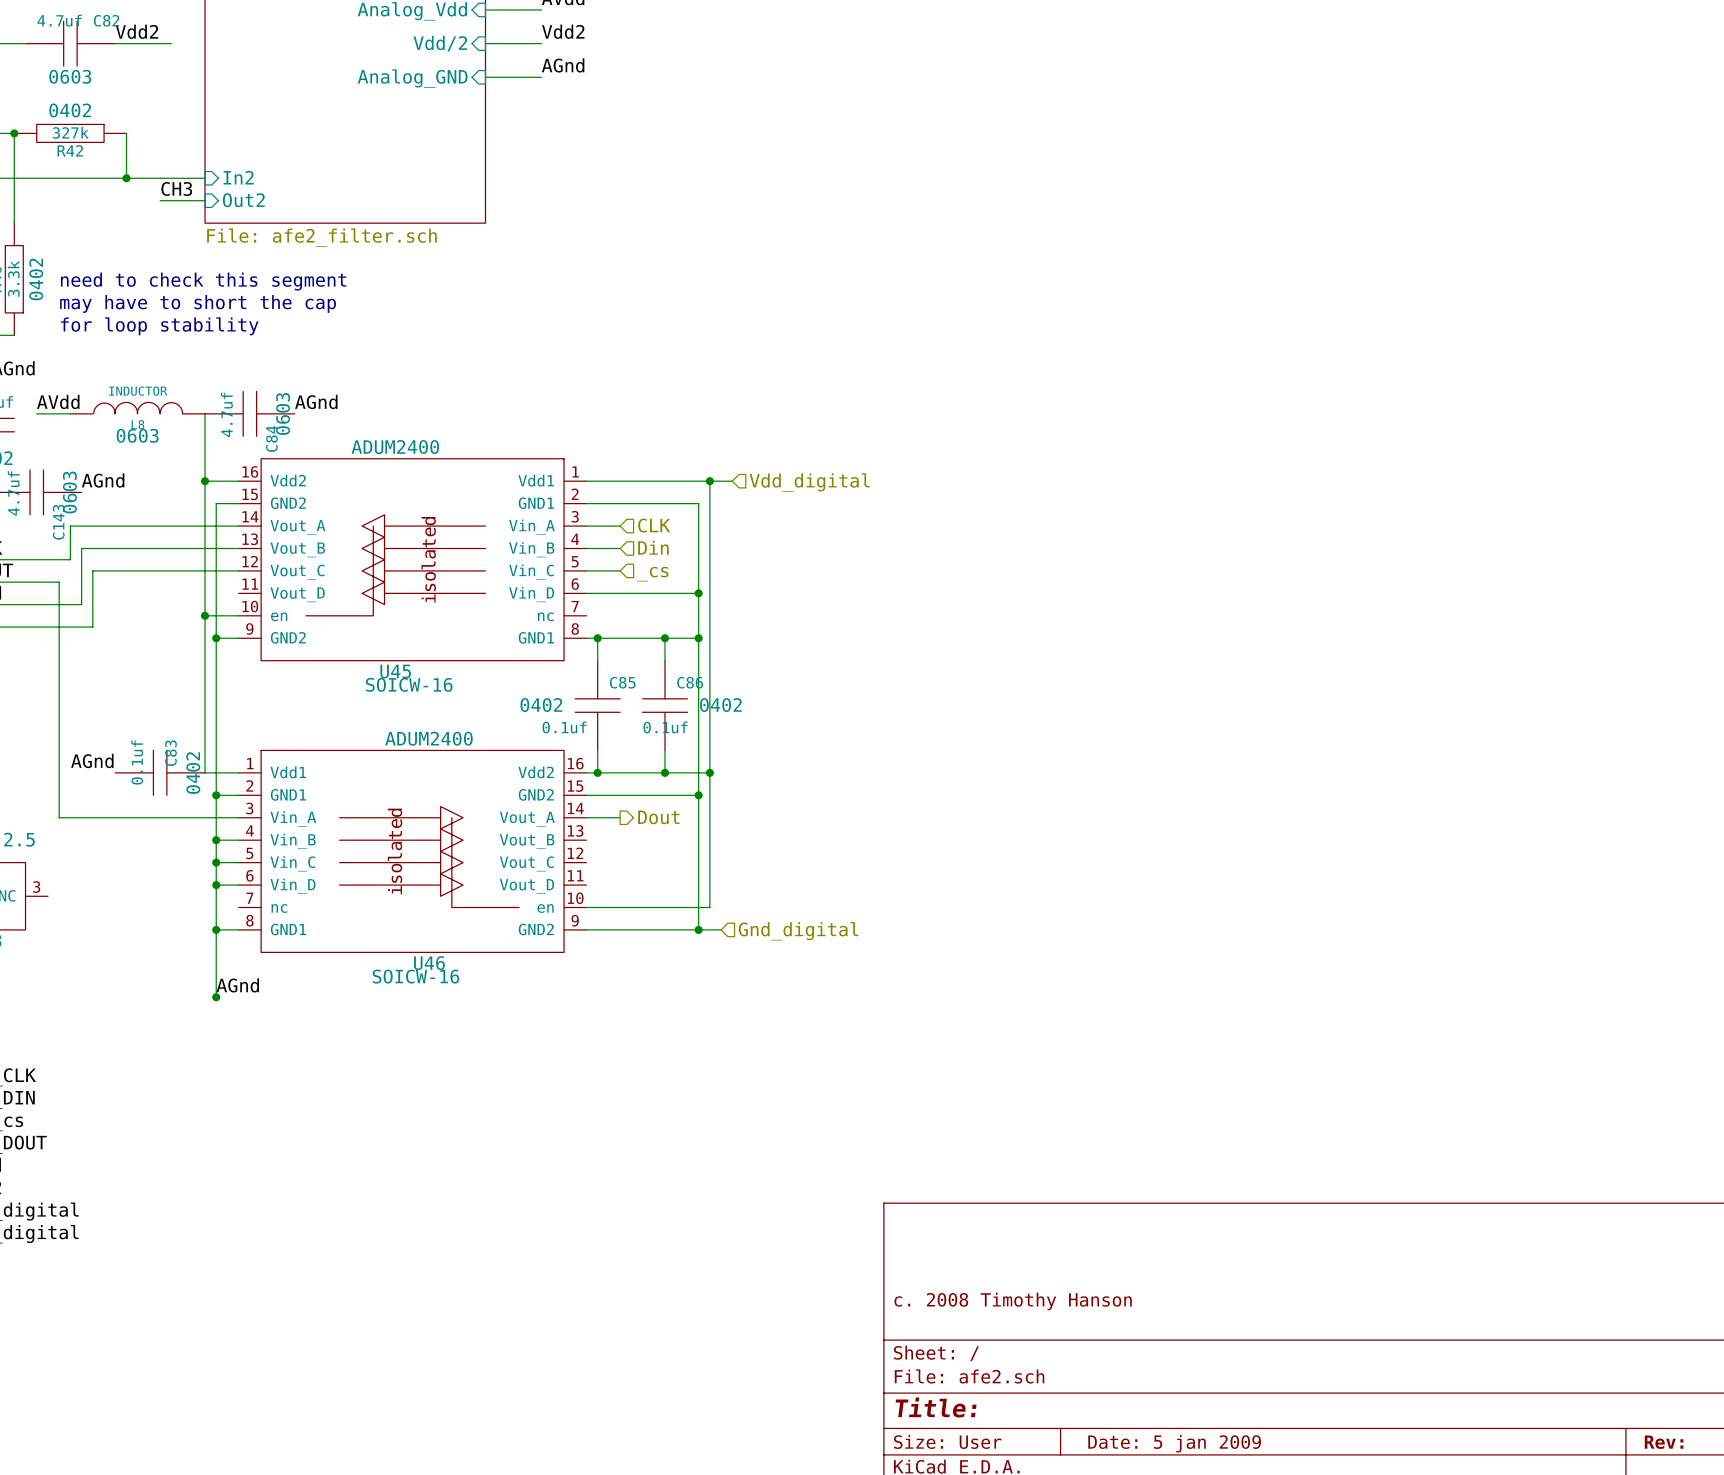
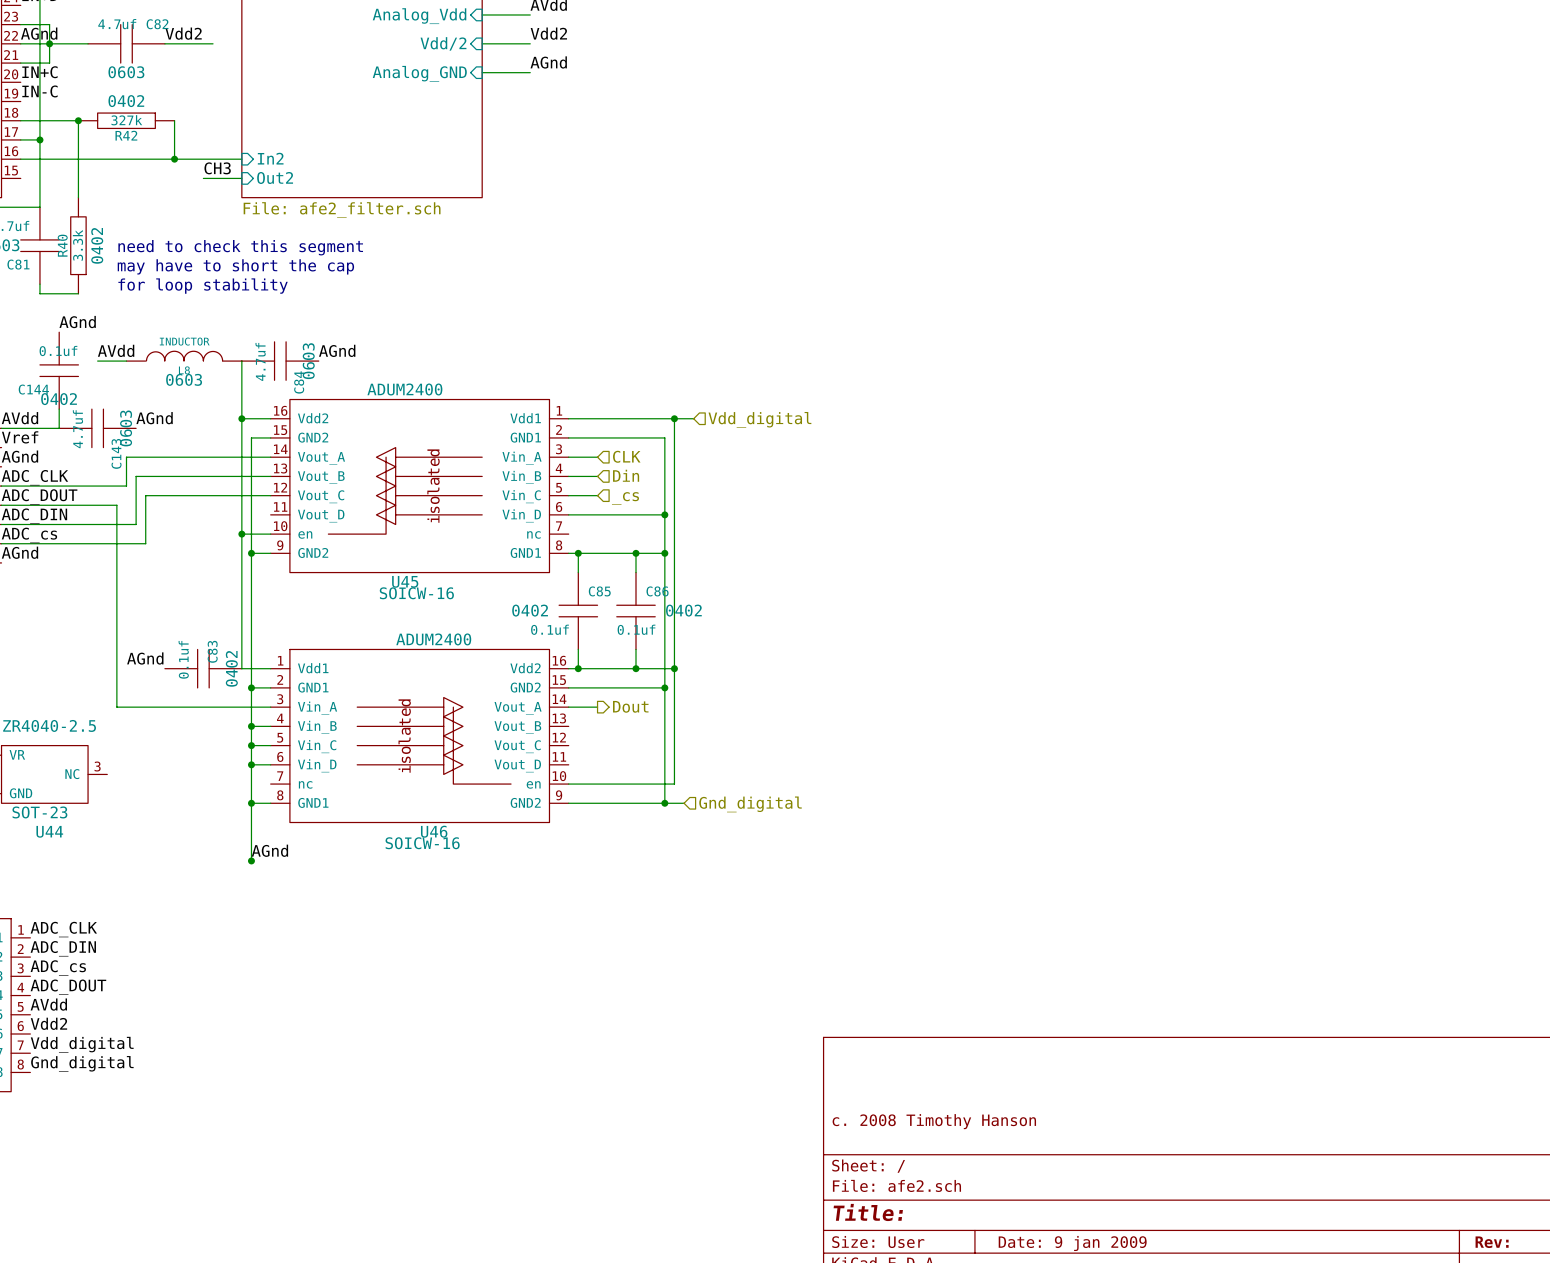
title block: Date: 5 jan 2009 (1174, 1443) -> Date: 9 jan 2009 (1072, 1243)

